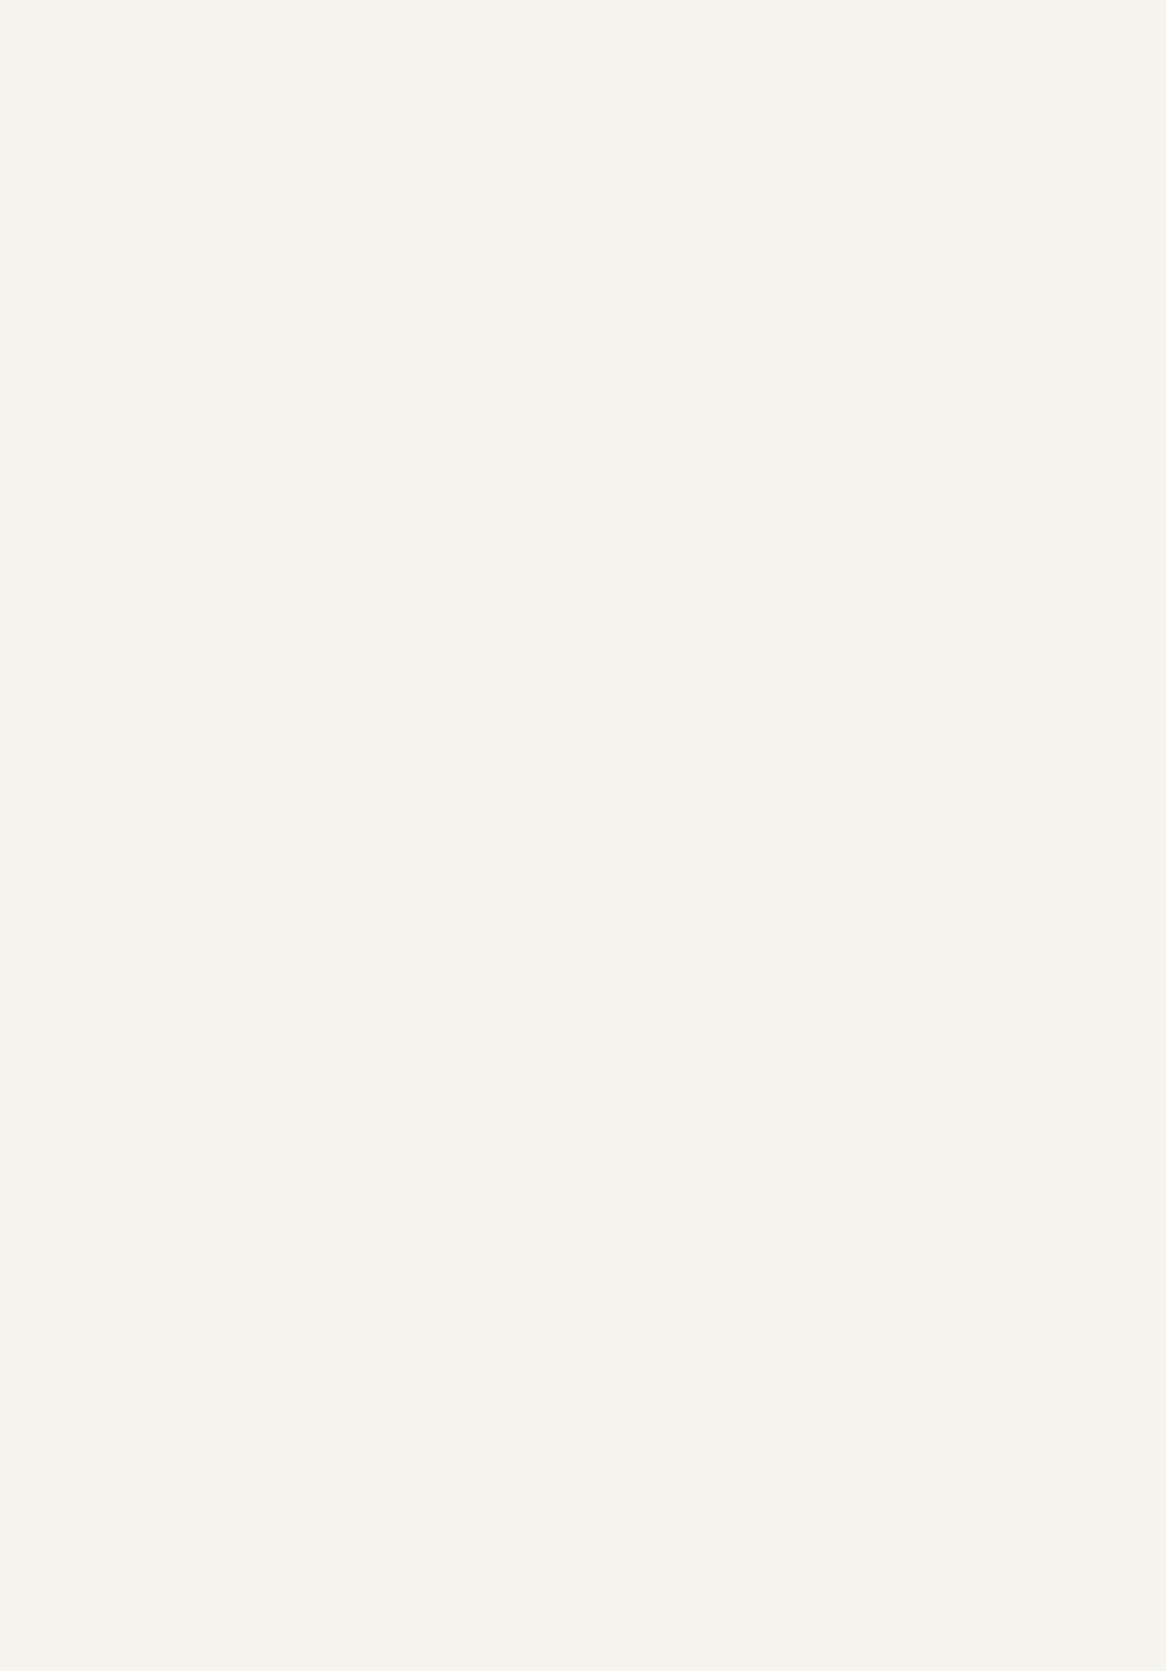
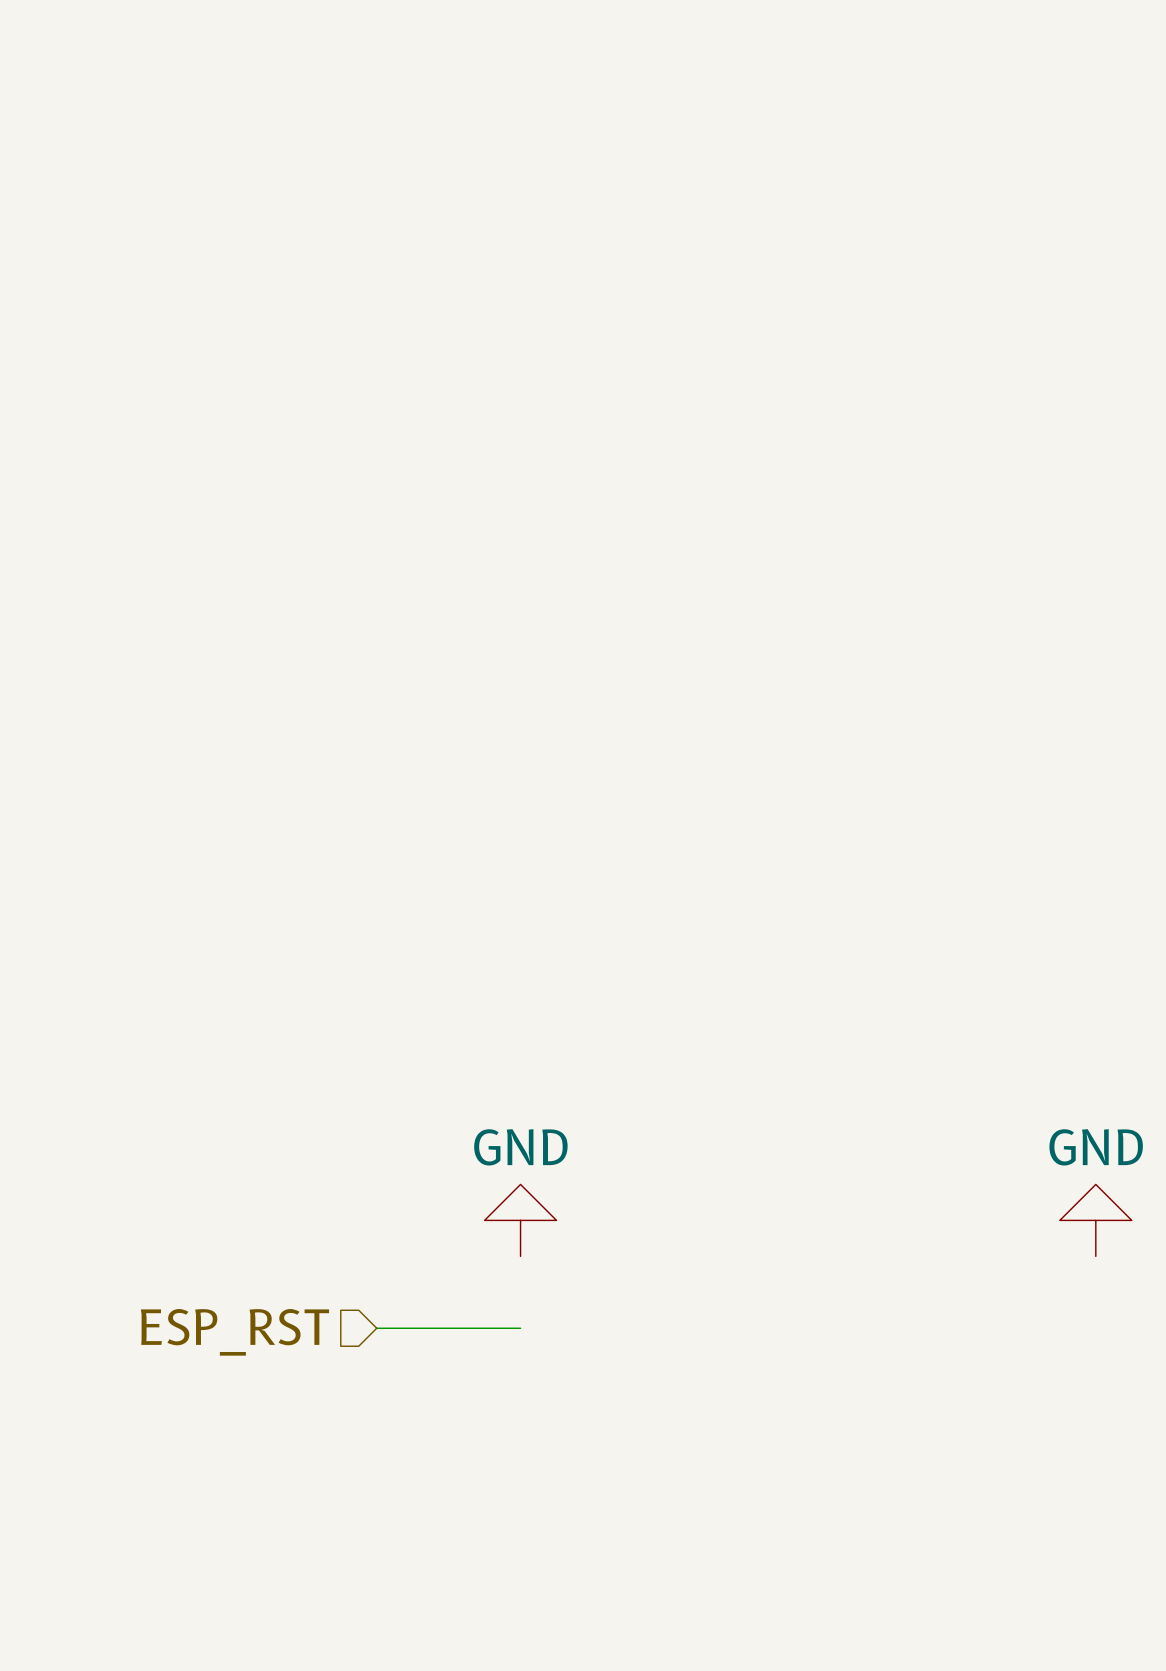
power symbol: none -> GND (520, 1220)
power symbol: none -> GND (1095, 1220)
wire: none -> (376, 1328) (520, 1328)
hierarchical label: none -> ESP_RST (234, 1332)

